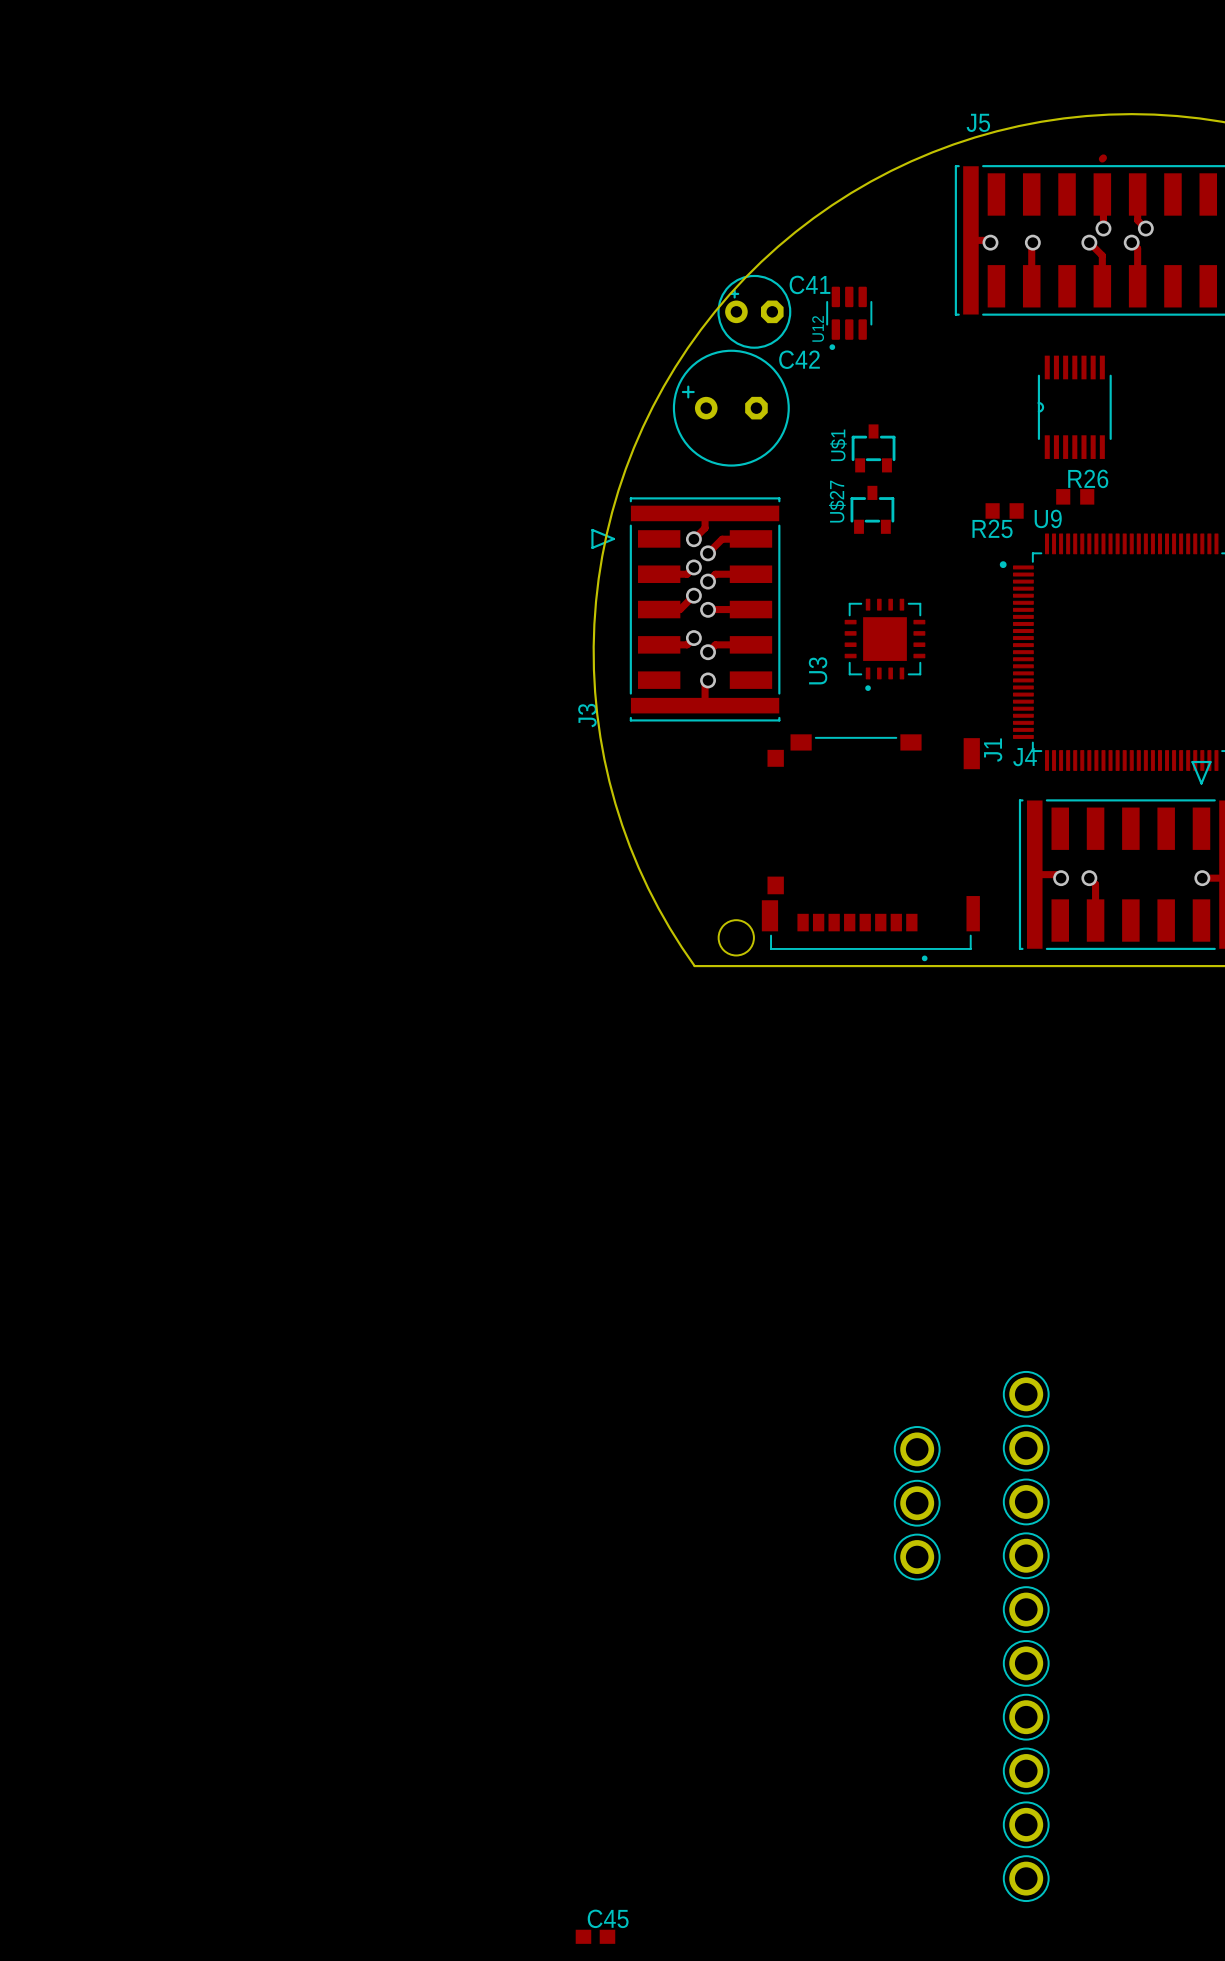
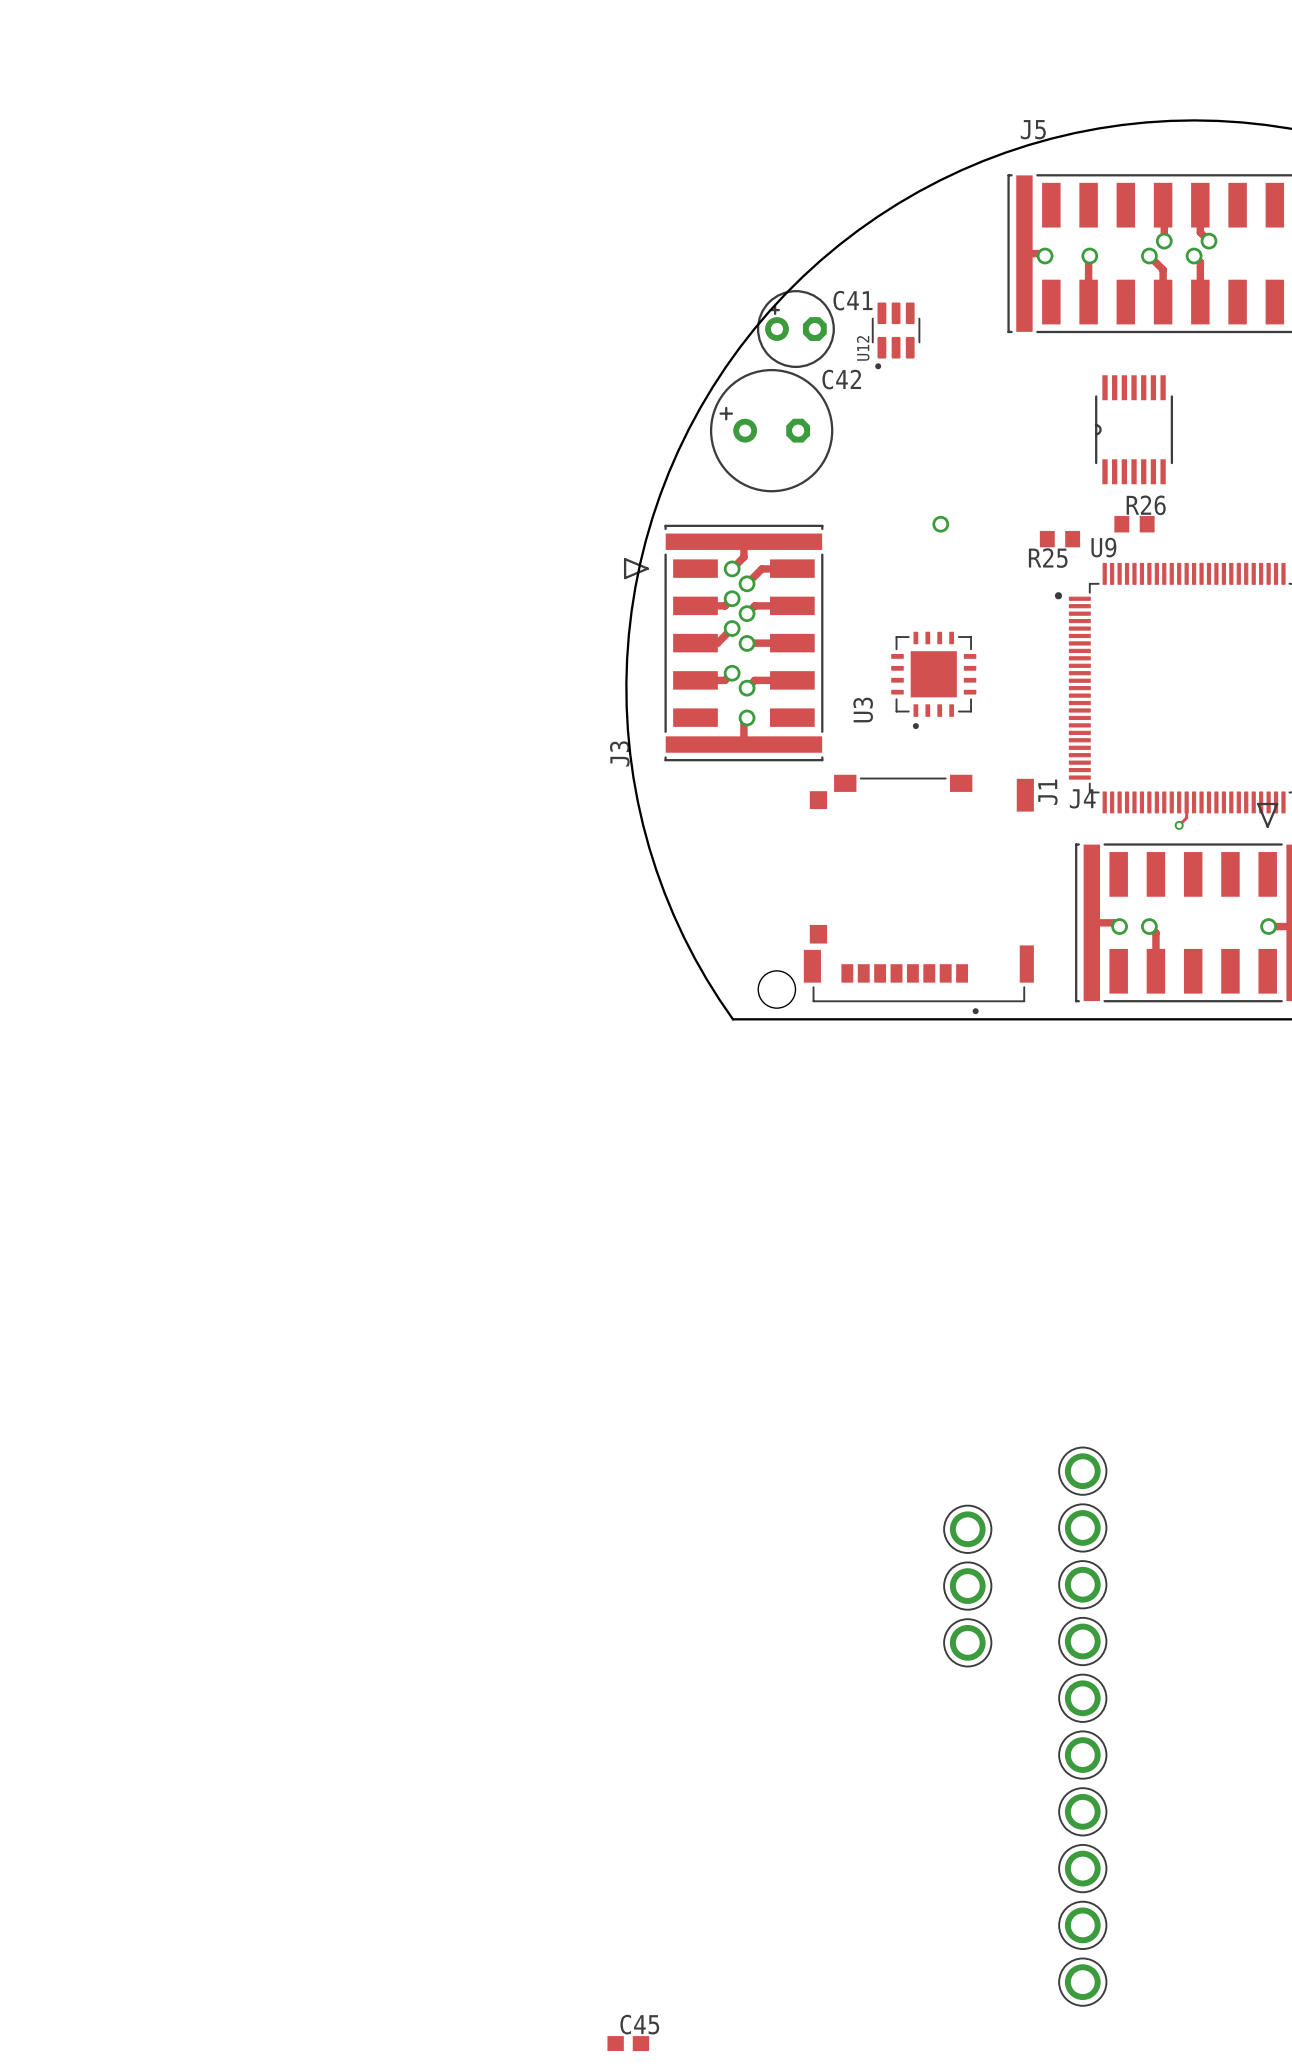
track: (1103, 157) (1102, 159) -> none
U$1: (873, 448) -> none
via: none -> (940, 524)
U$27: (872, 509) -> none
track: none -> (1186, 806) (1186, 817) (1179, 825)
via: none -> (1179, 825)

